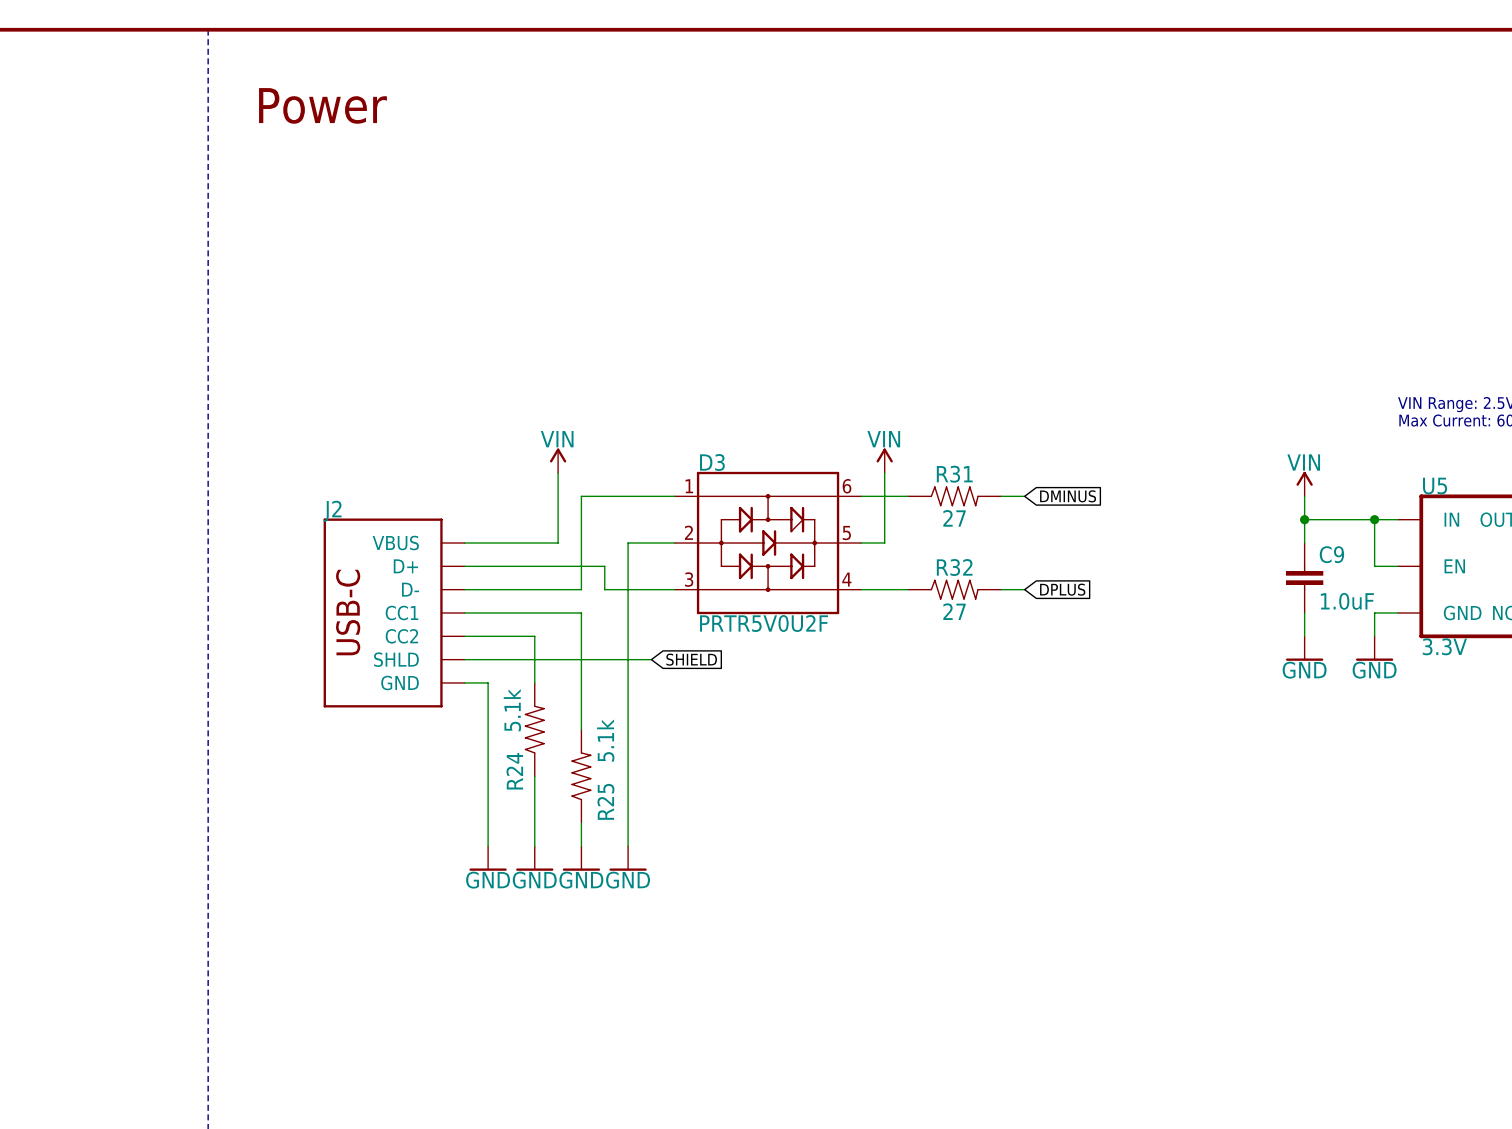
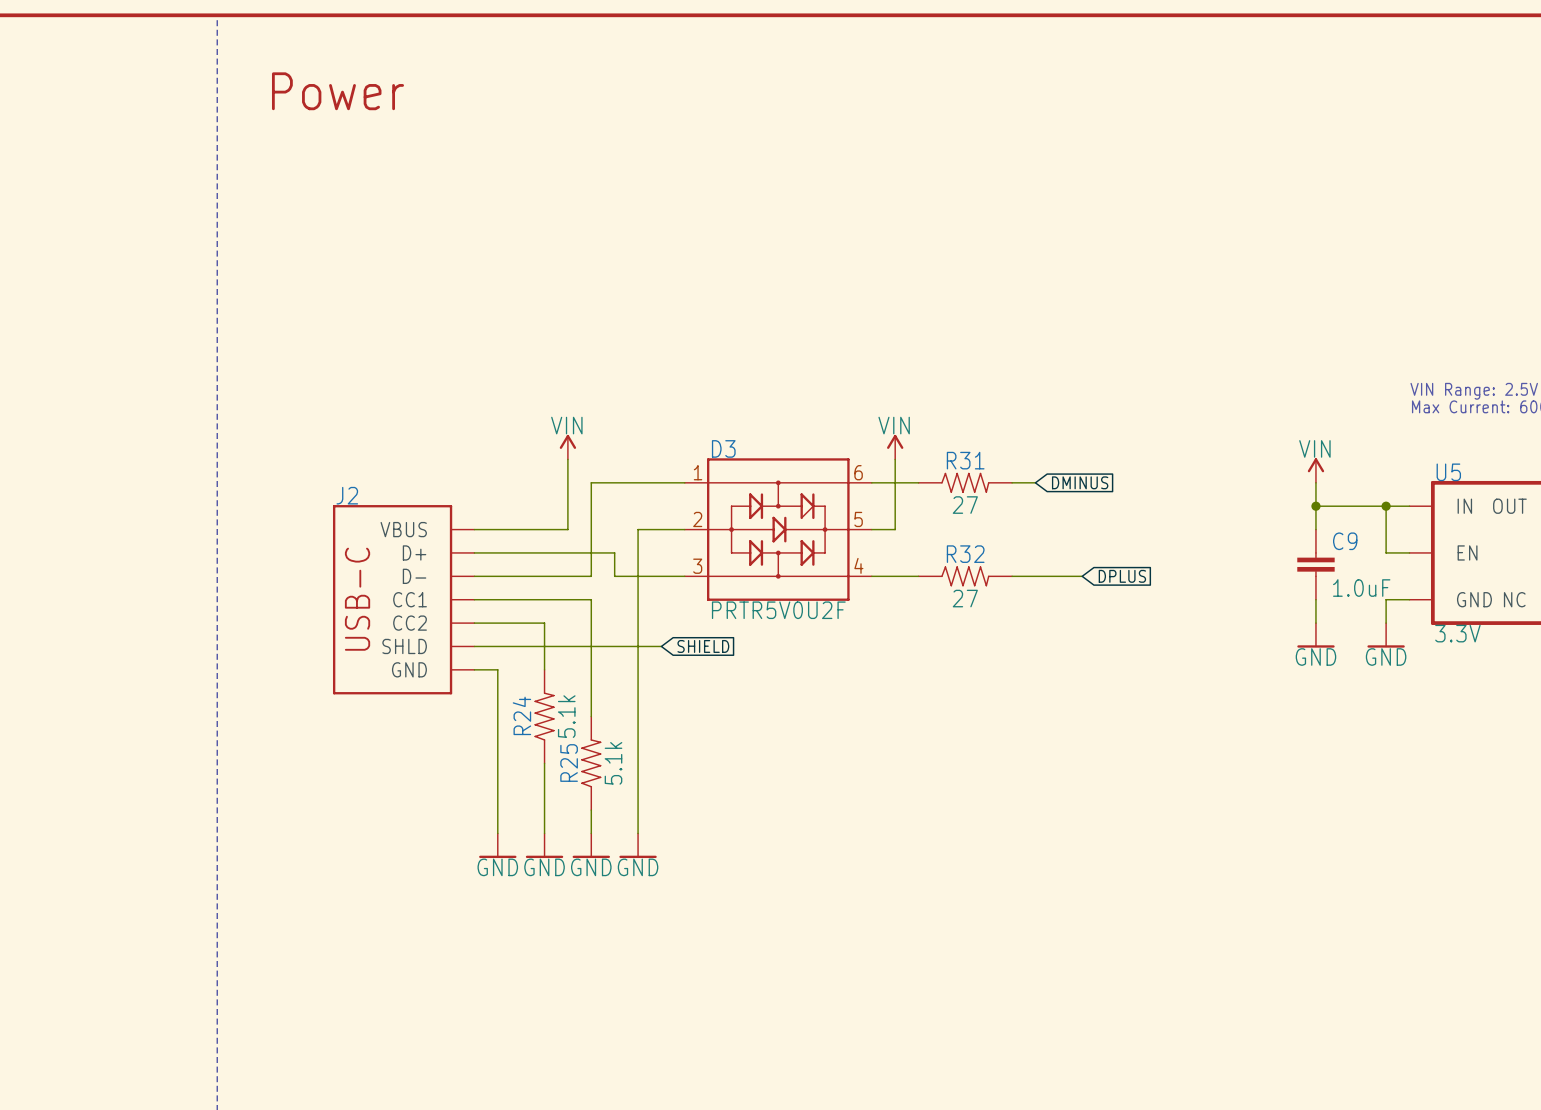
wire: none -> (1035, 576) (1082, 576)
global label position: DPLUS (1062, 589) -> DPLUS (1122, 576)
R24 value position: 5.1k (512, 710) -> 5.1k (566, 716)
R25 value position: 5.1k (605, 740) -> 5.1k (613, 763)
R24 name position: R24 (514, 771) -> R24 (521, 715)
R25 name position: R25 (605, 801) -> R25 (569, 763)

